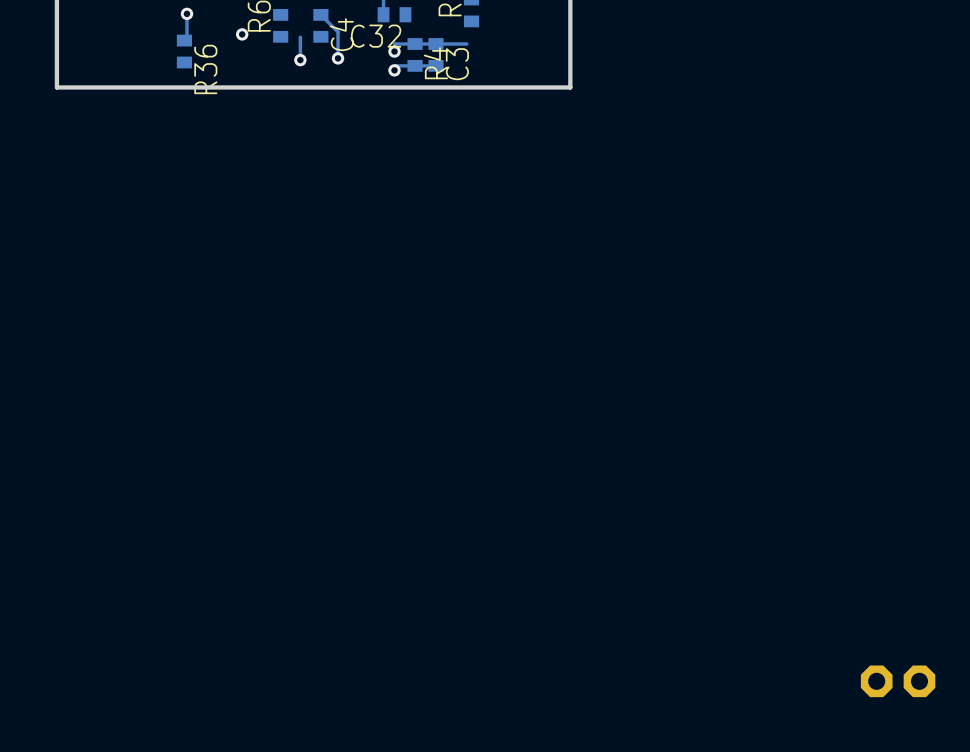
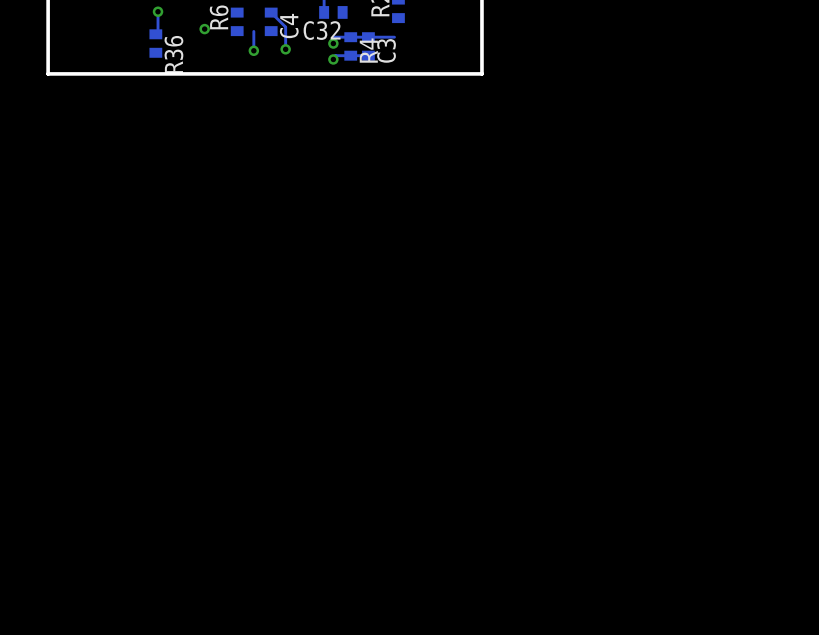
part: (898, 681) -> none

